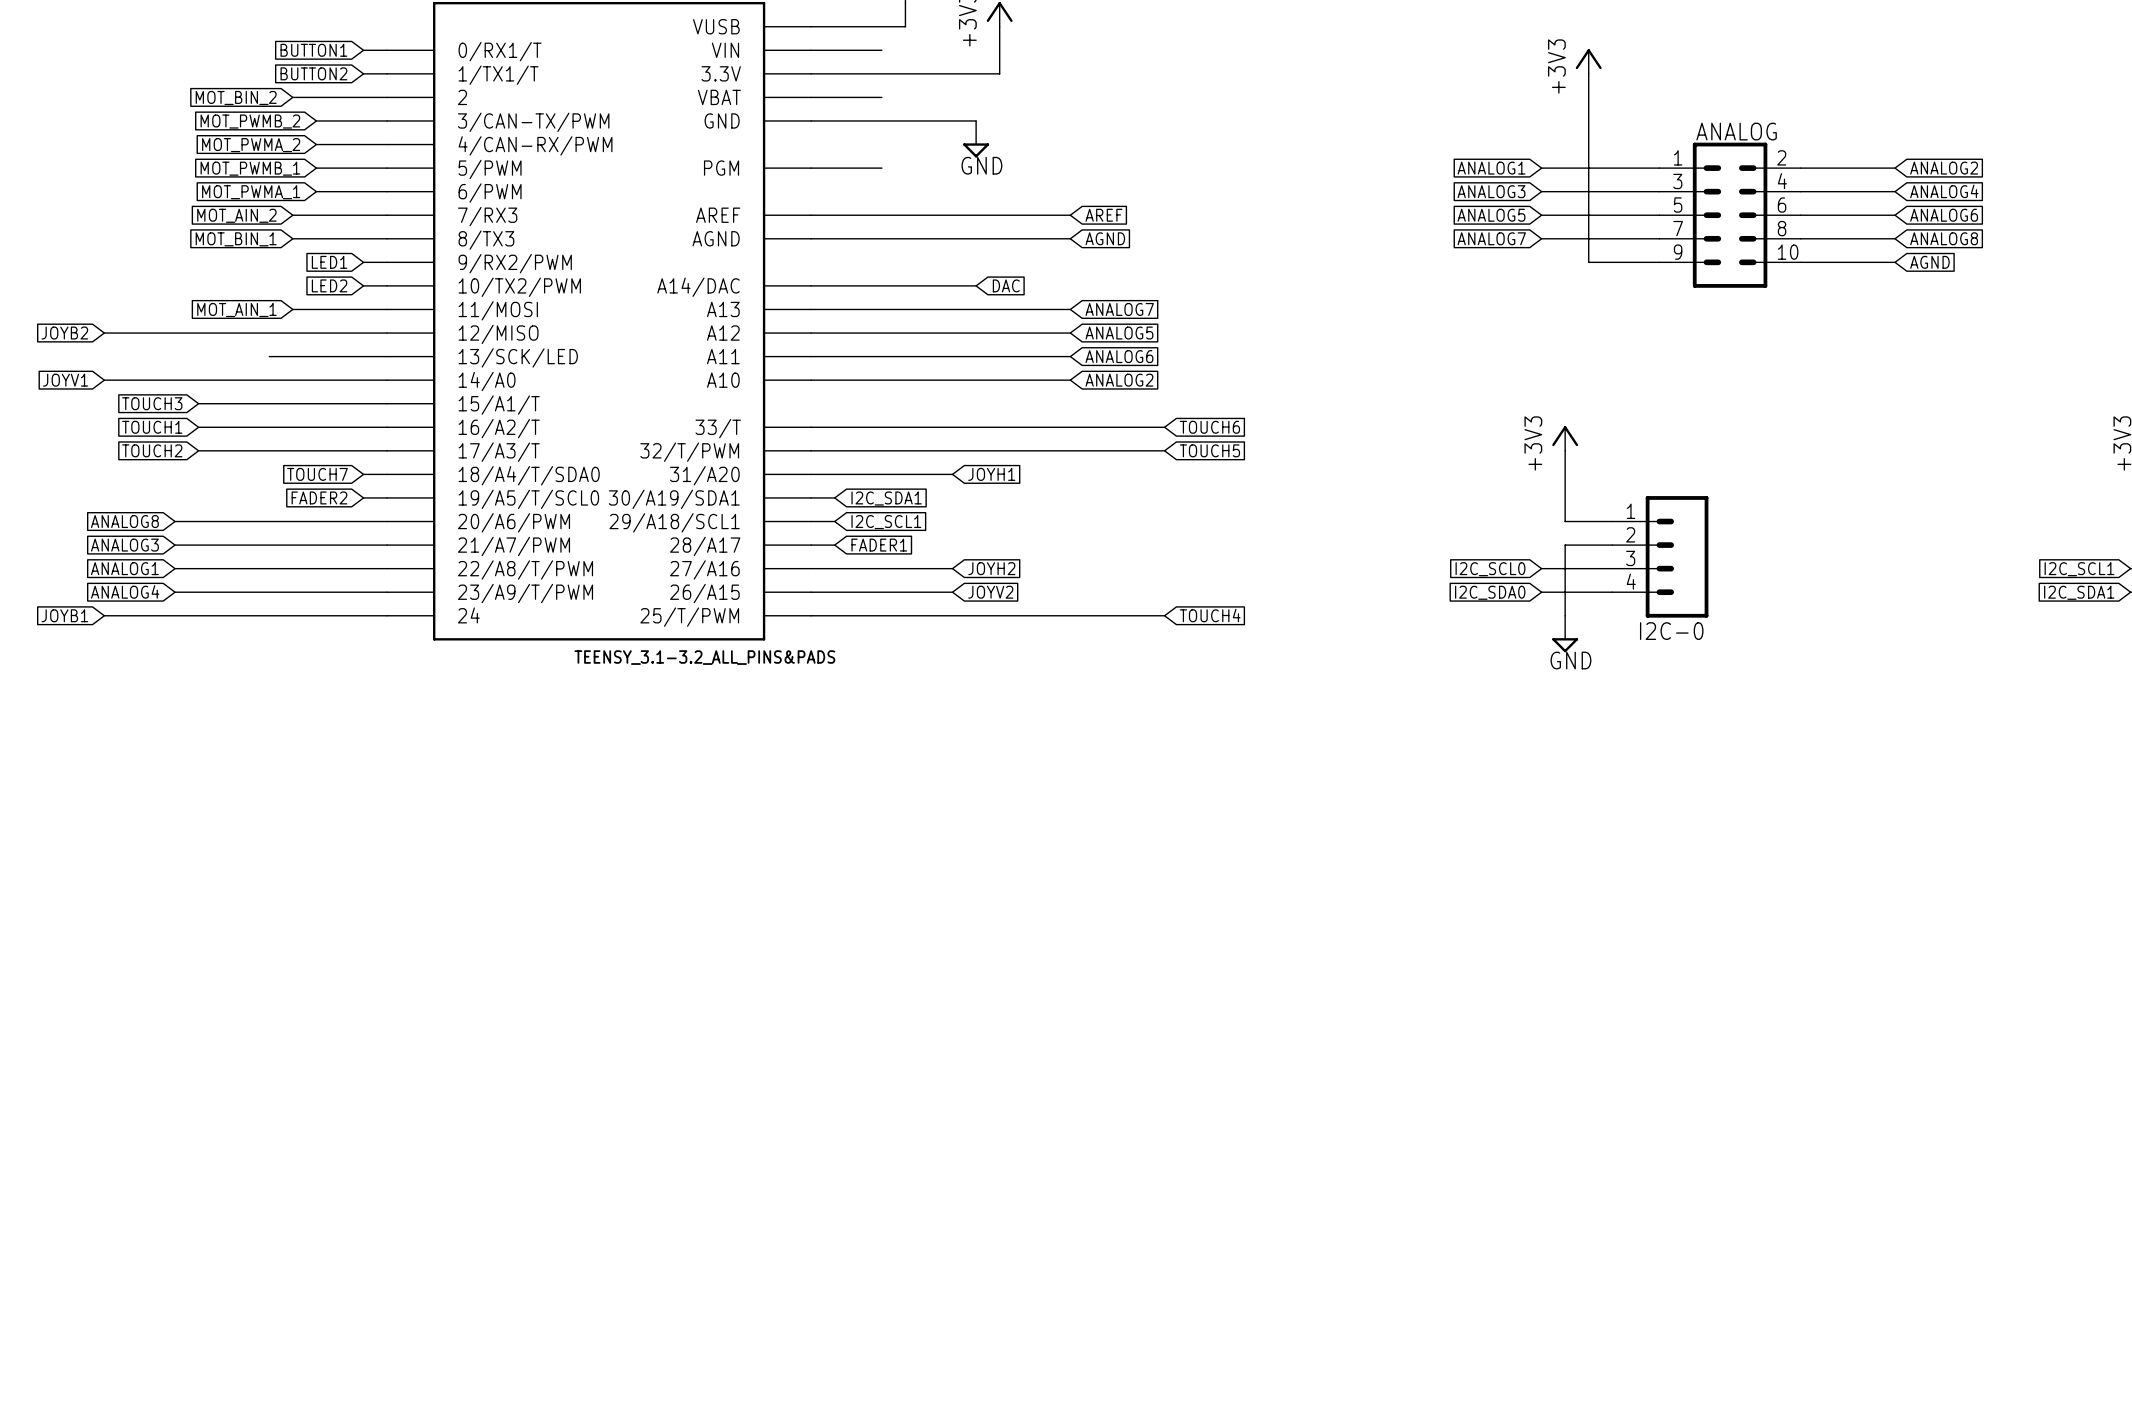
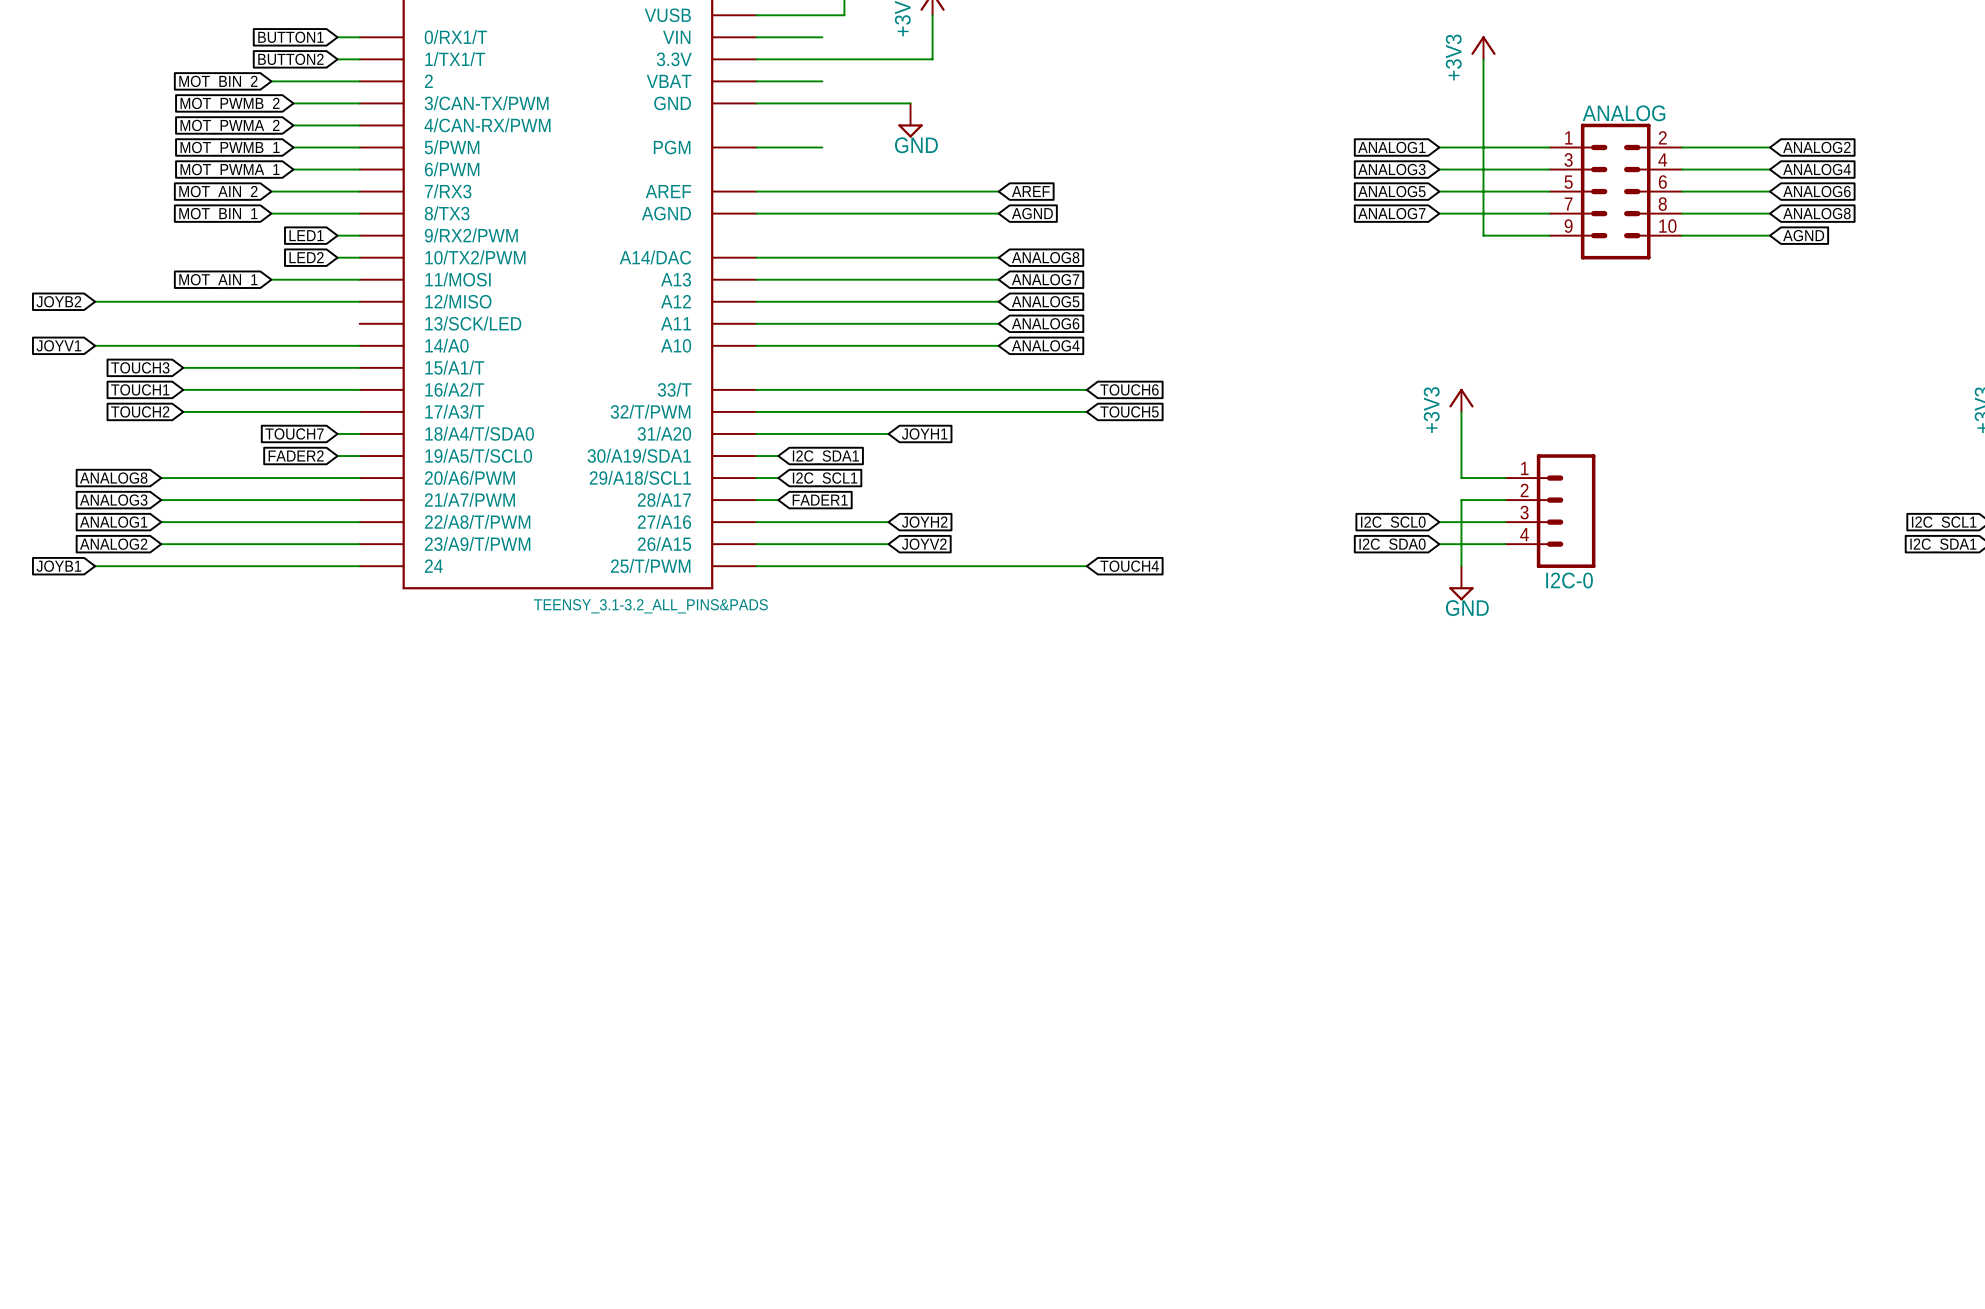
wire: none -> (910, 257) (998, 257)
global label: DAC (1006, 285) -> none
global label: none -> ANALOG8 (1045, 257)
wire: (269, 356) (387, 356) -> none
global label: ANALOG2 (1119, 380) -> ANALOG4 (1045, 345)
global label: ANALOG4 (125, 591) -> ANALOG2 (113, 544)

